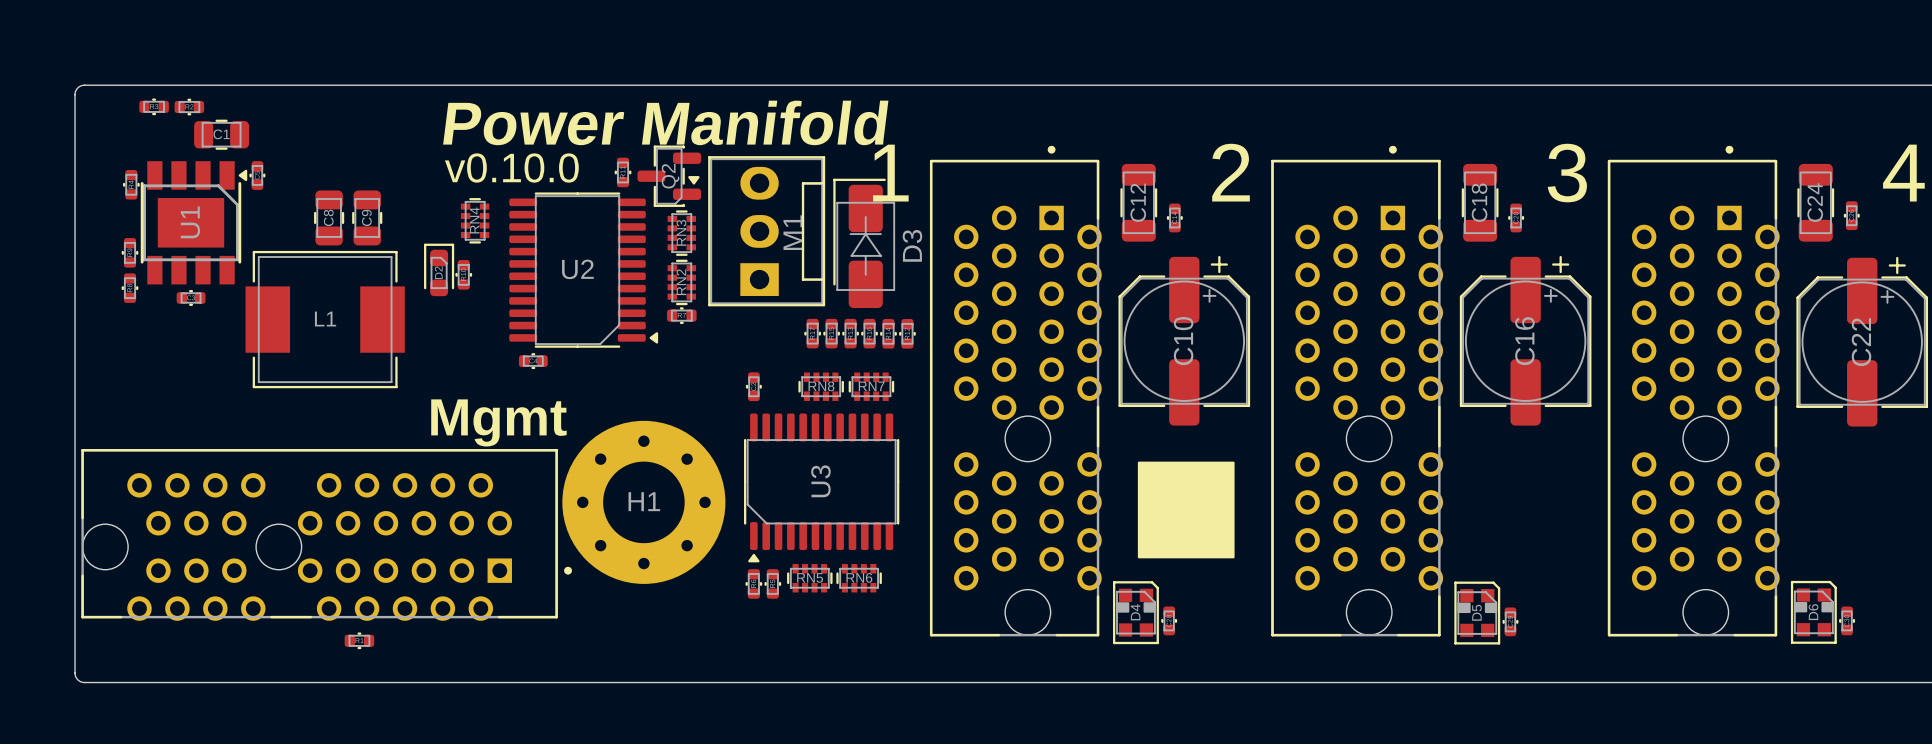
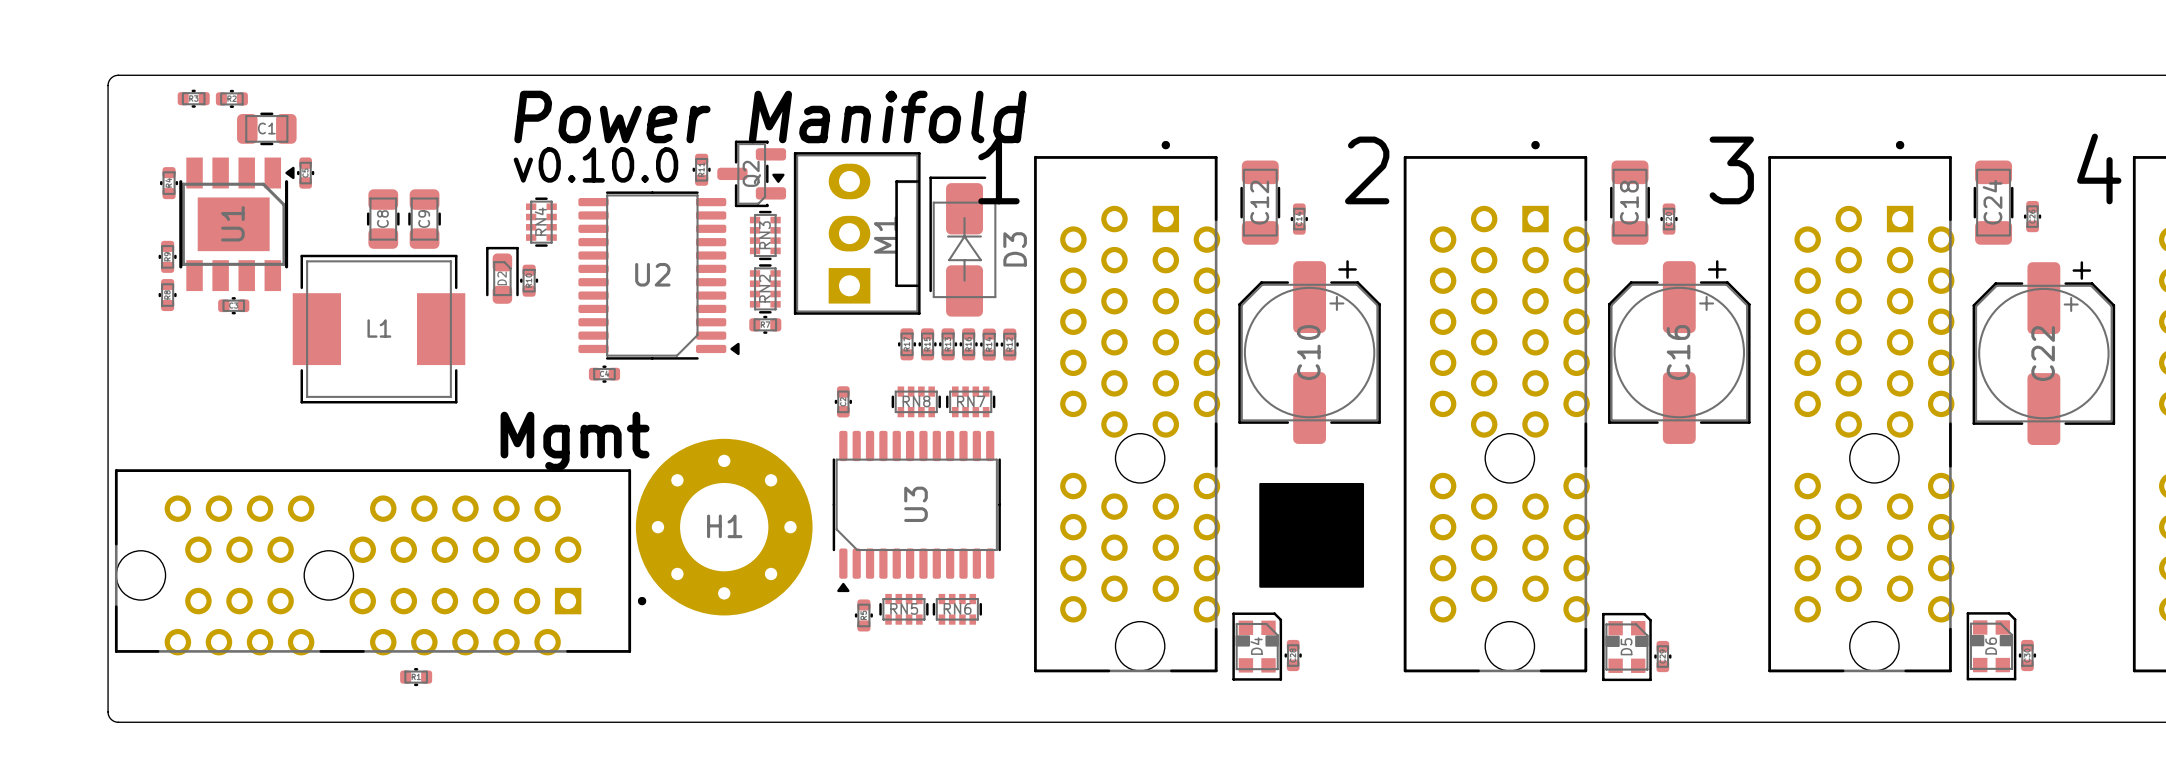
part: (753, 583) -> none

